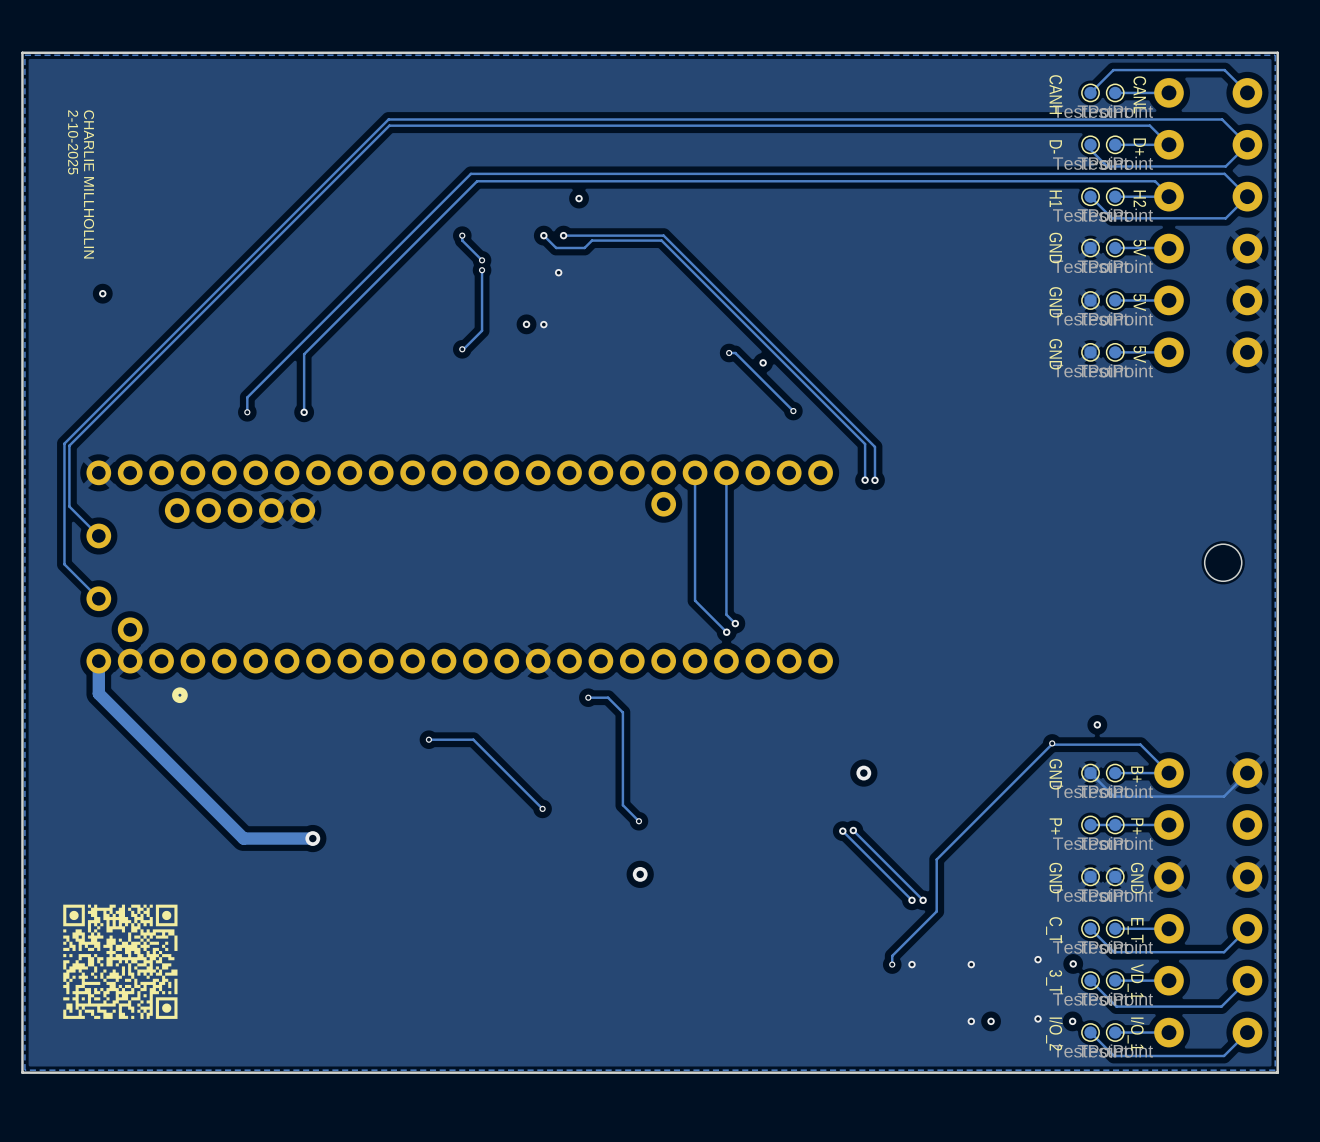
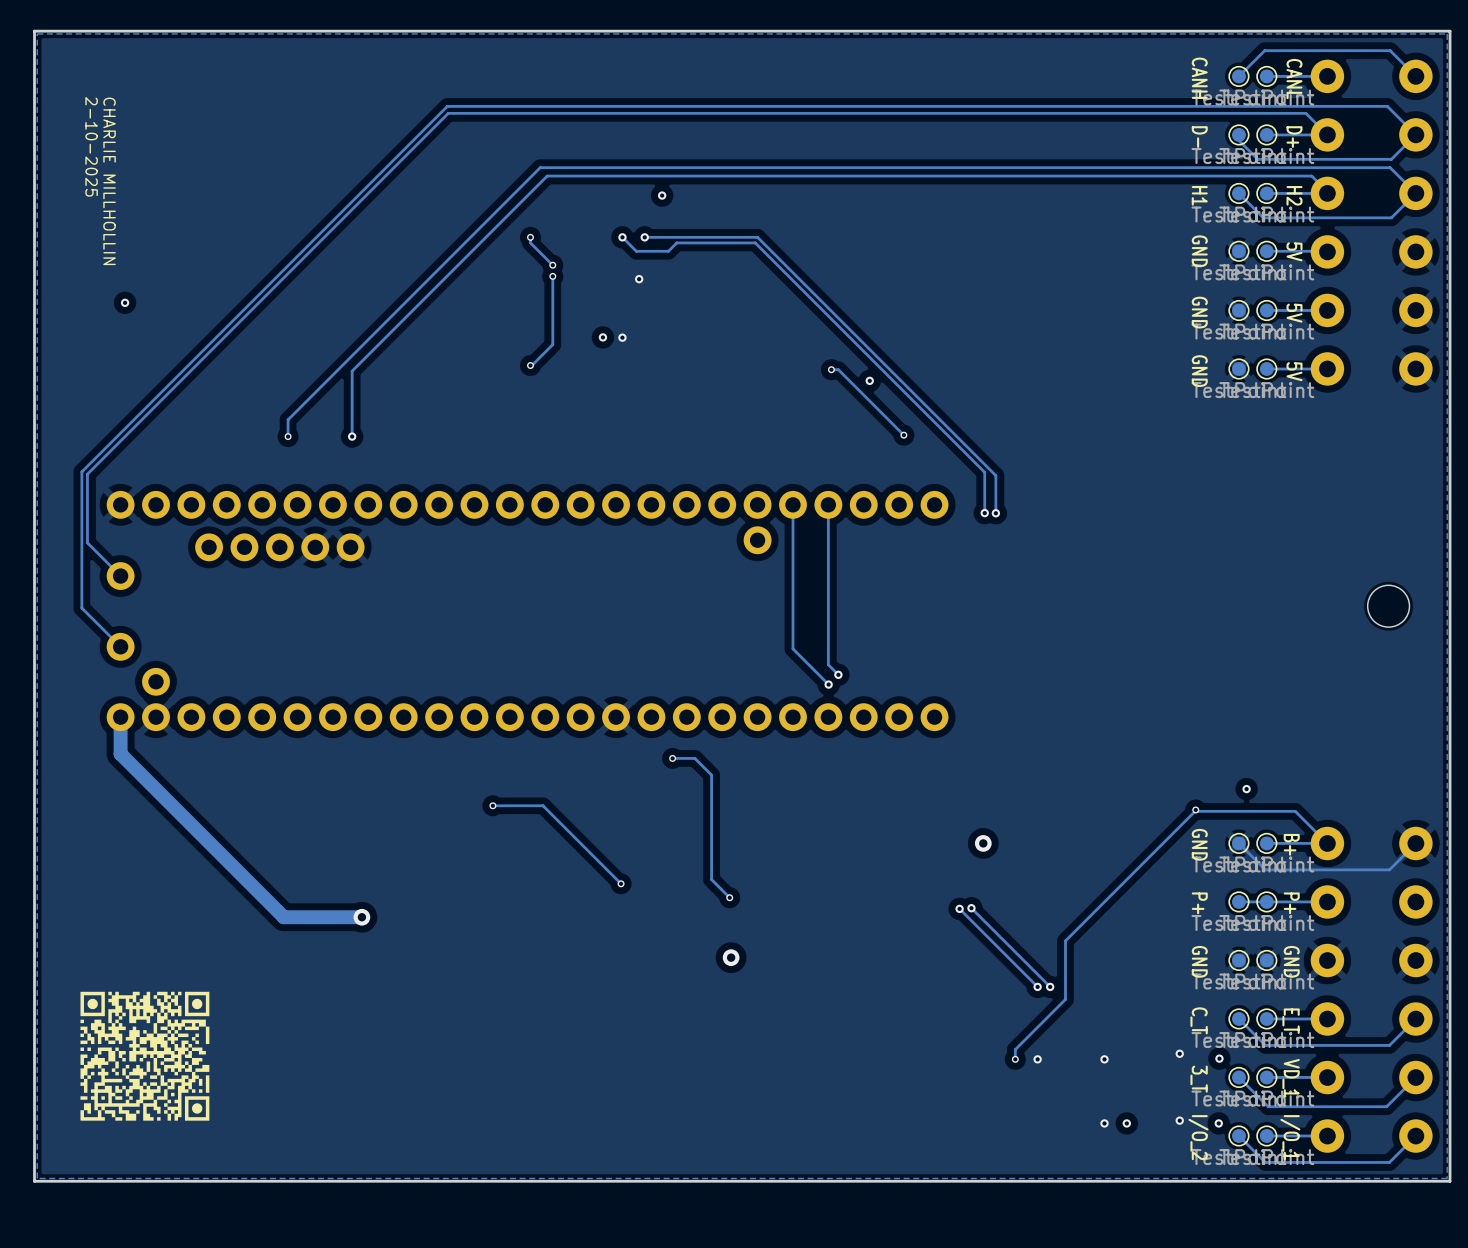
part: (179, 695) -> none

